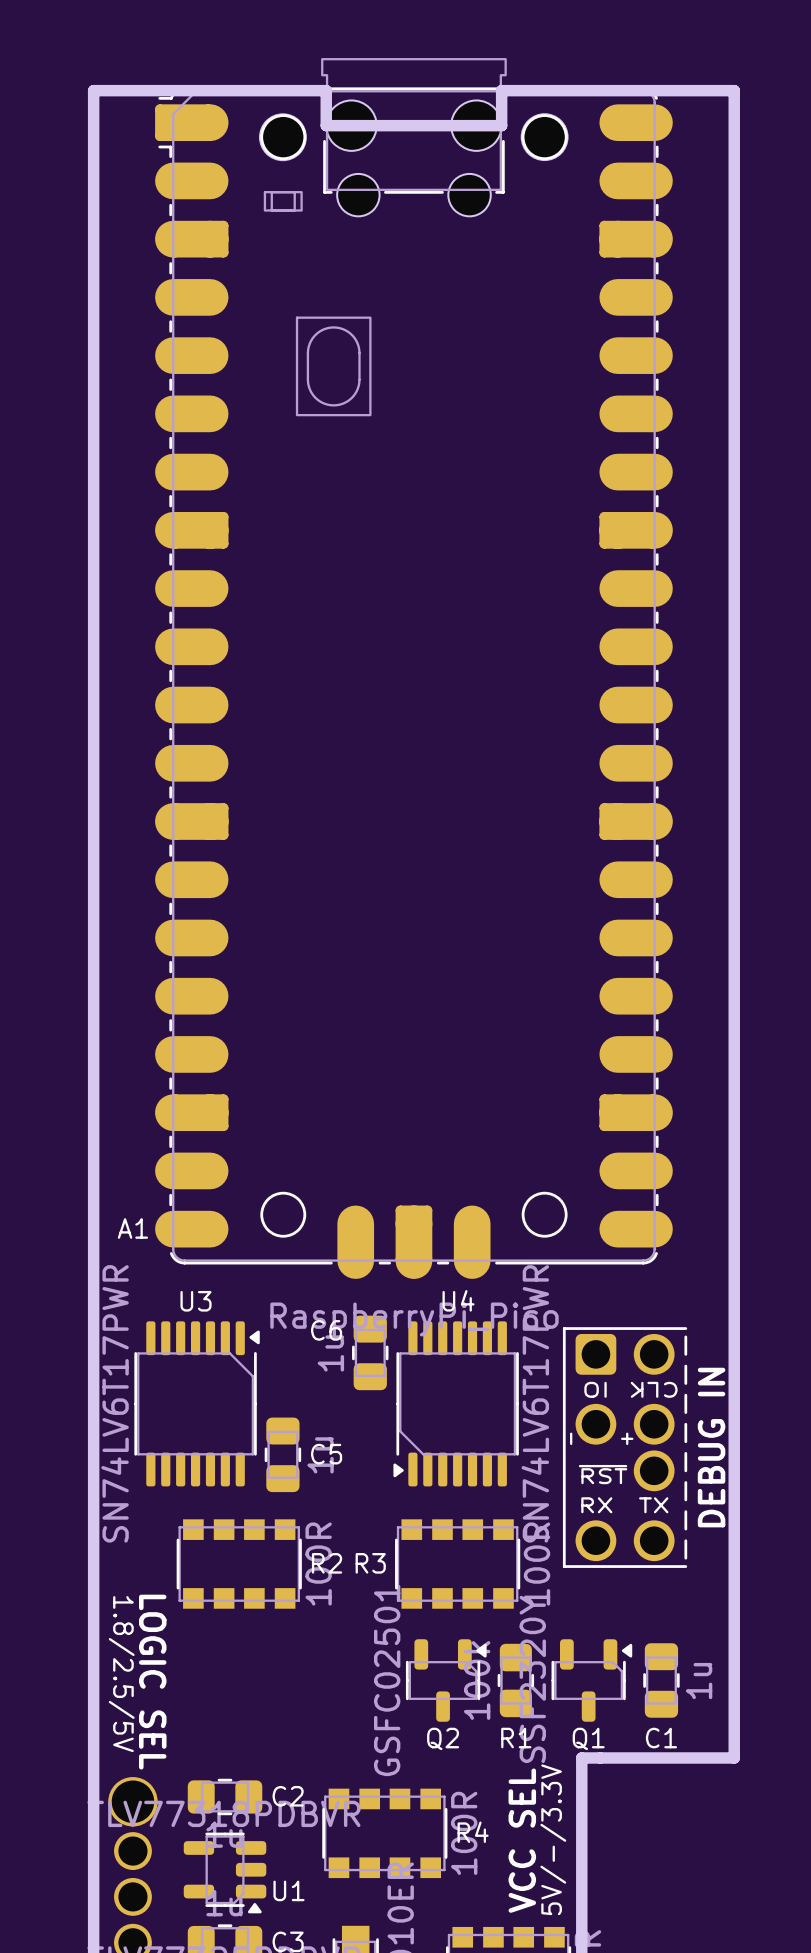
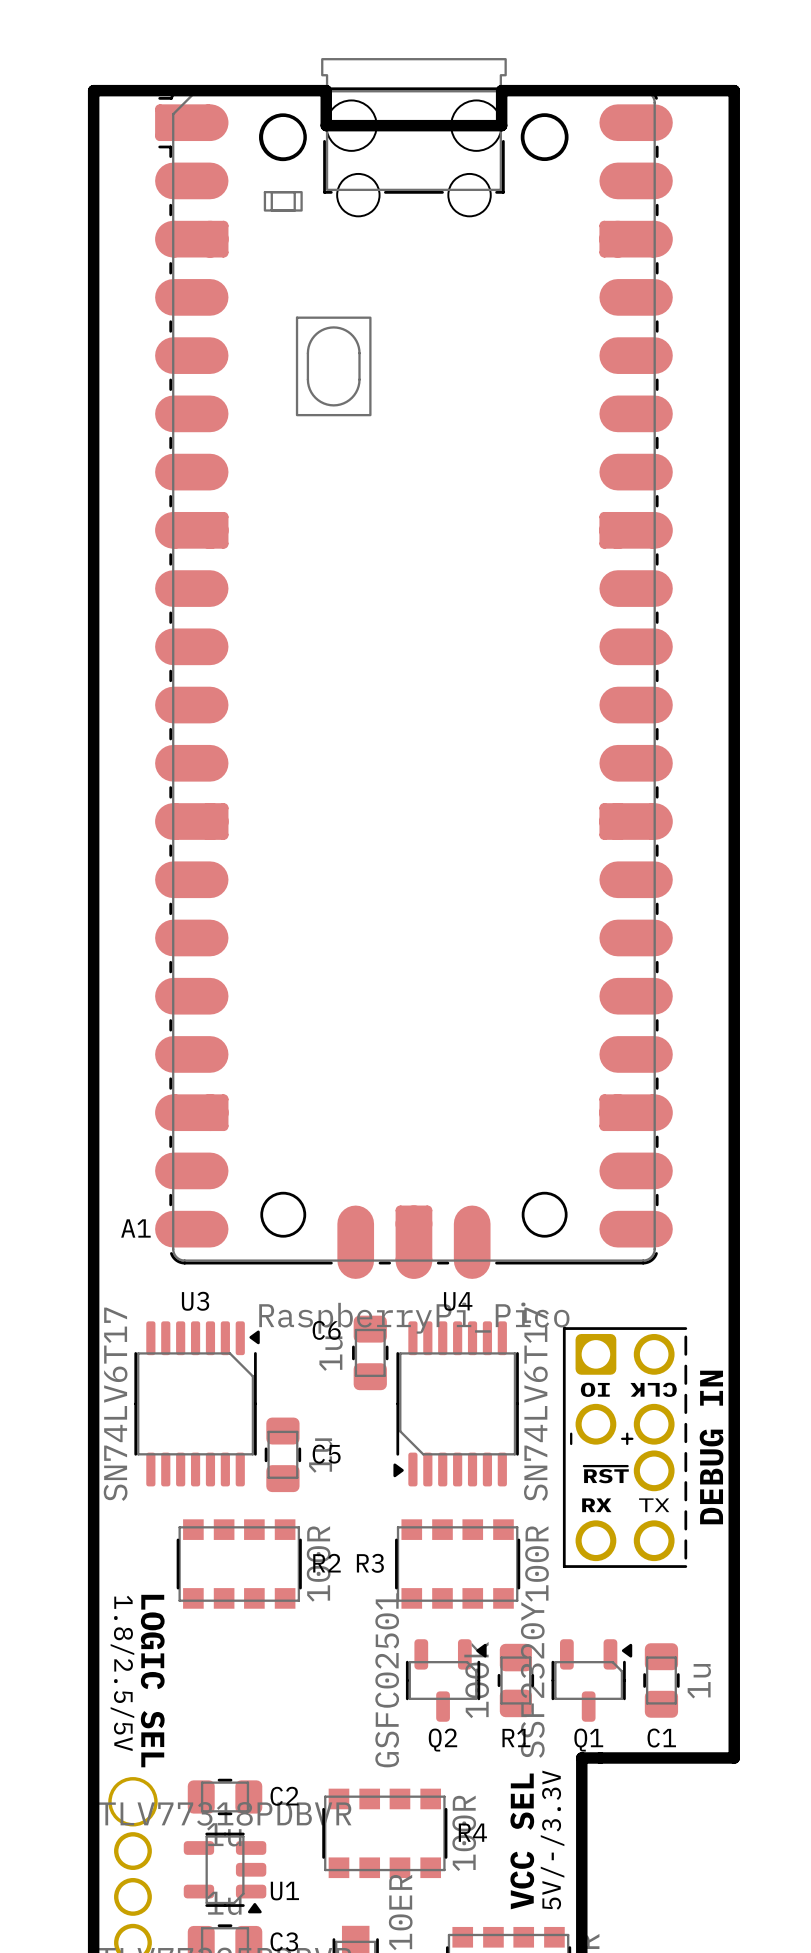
U3 value: SN74LV6T17PWR (115, 1403) -> SN74LV6T17 (115, 1404)
U4 value: SN74LV6T17PWR (535, 1403) -> SN74LV6T17 (535, 1404)

